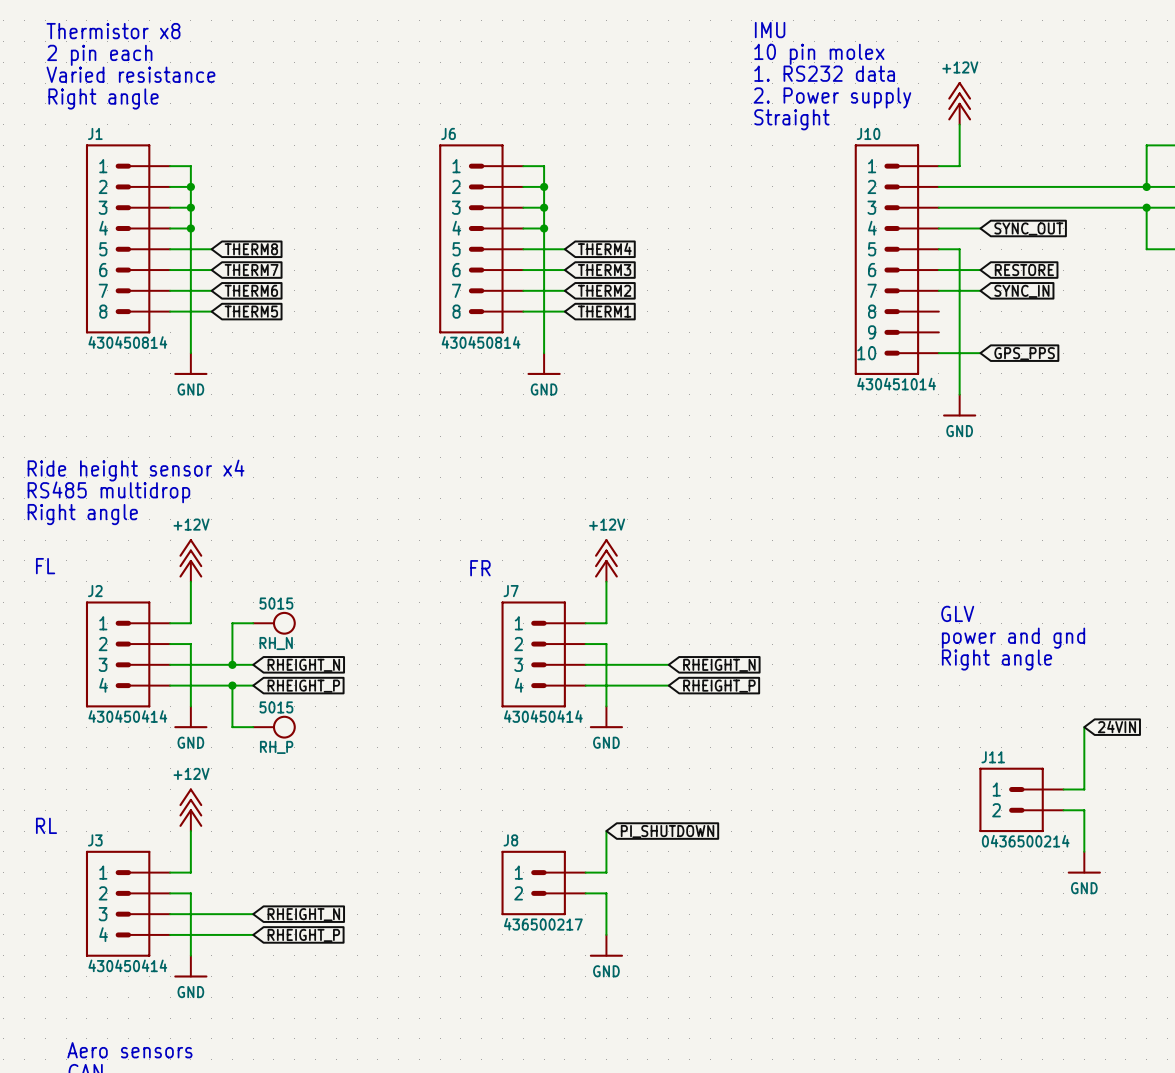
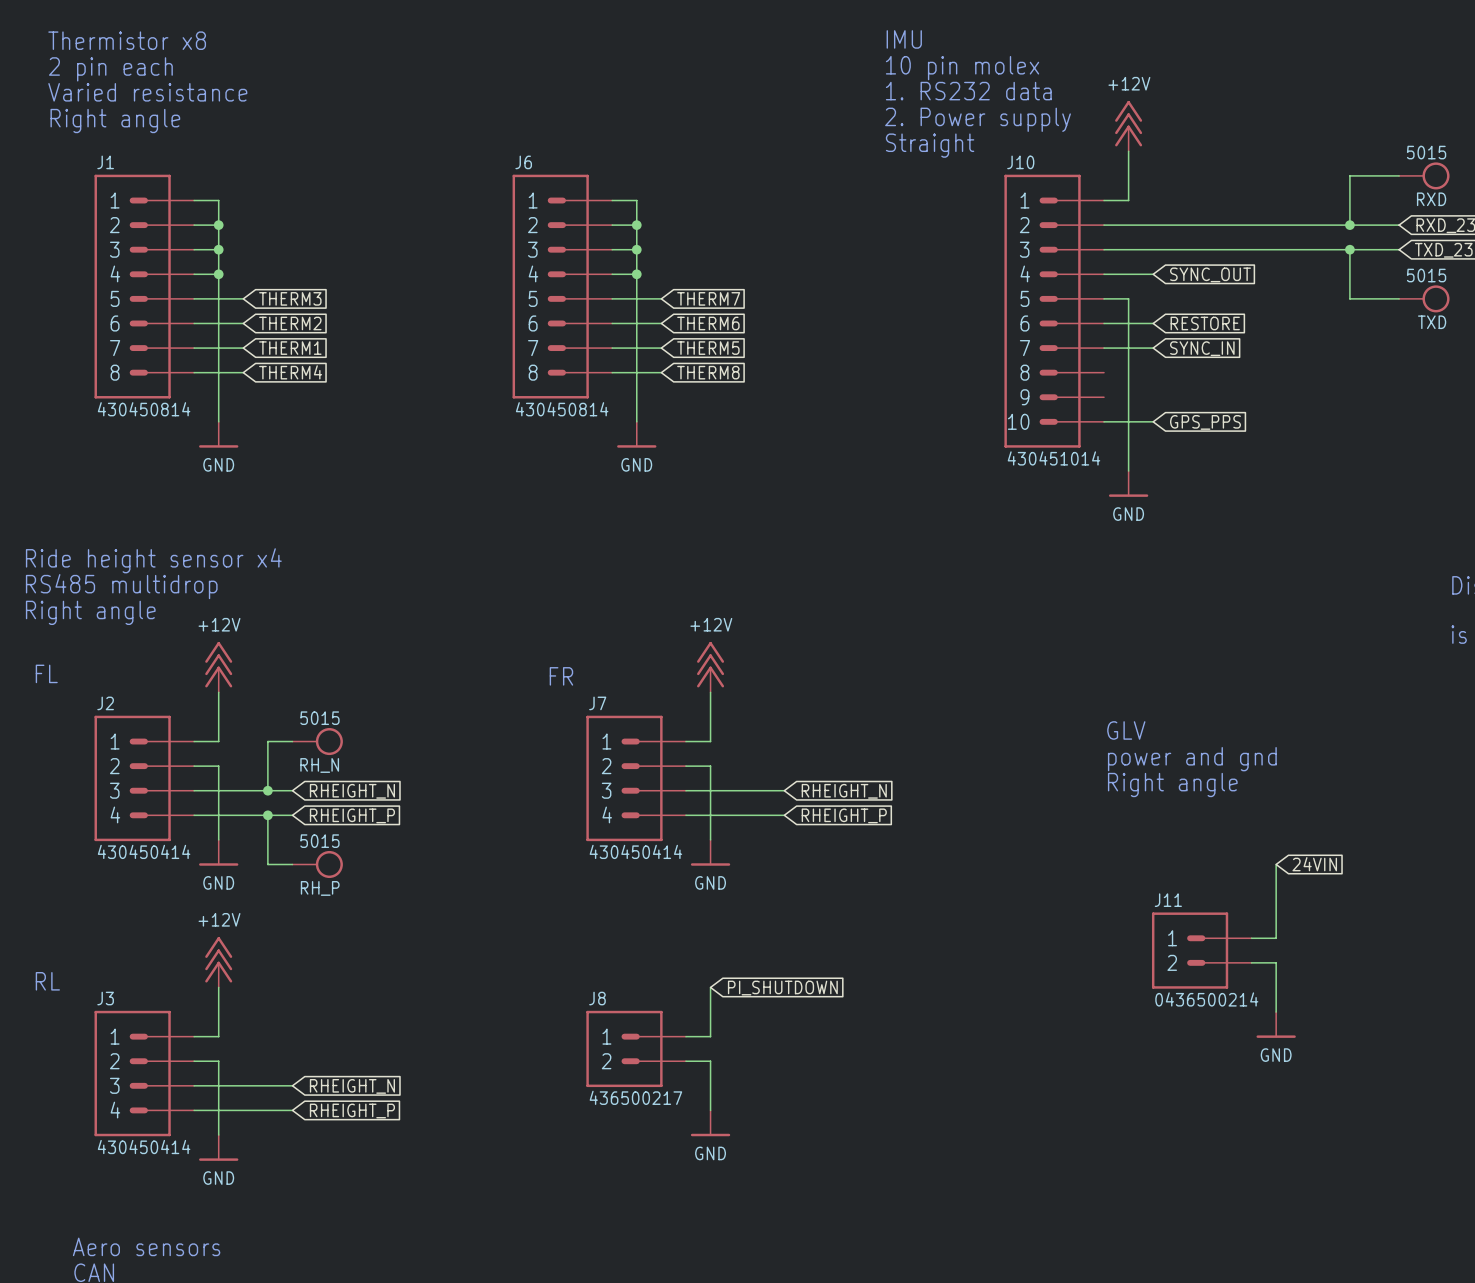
global label: THERM8 (251, 249) -> THERM3 (290, 298)
global label: THERM4 (604, 249) -> THERM7 (708, 298)
global label: THERM7 (251, 270) -> THERM2 (290, 323)
global label: THERM3 (604, 270) -> THERM6 (708, 323)
global label: THERM6 (251, 290) -> THERM1 (290, 348)
global label: THERM2 (604, 290) -> THERM5 (708, 348)
global label: THERM5 (251, 311) -> THERM4 (290, 372)
global label: THERM1 (604, 311) -> THERM8 (708, 372)

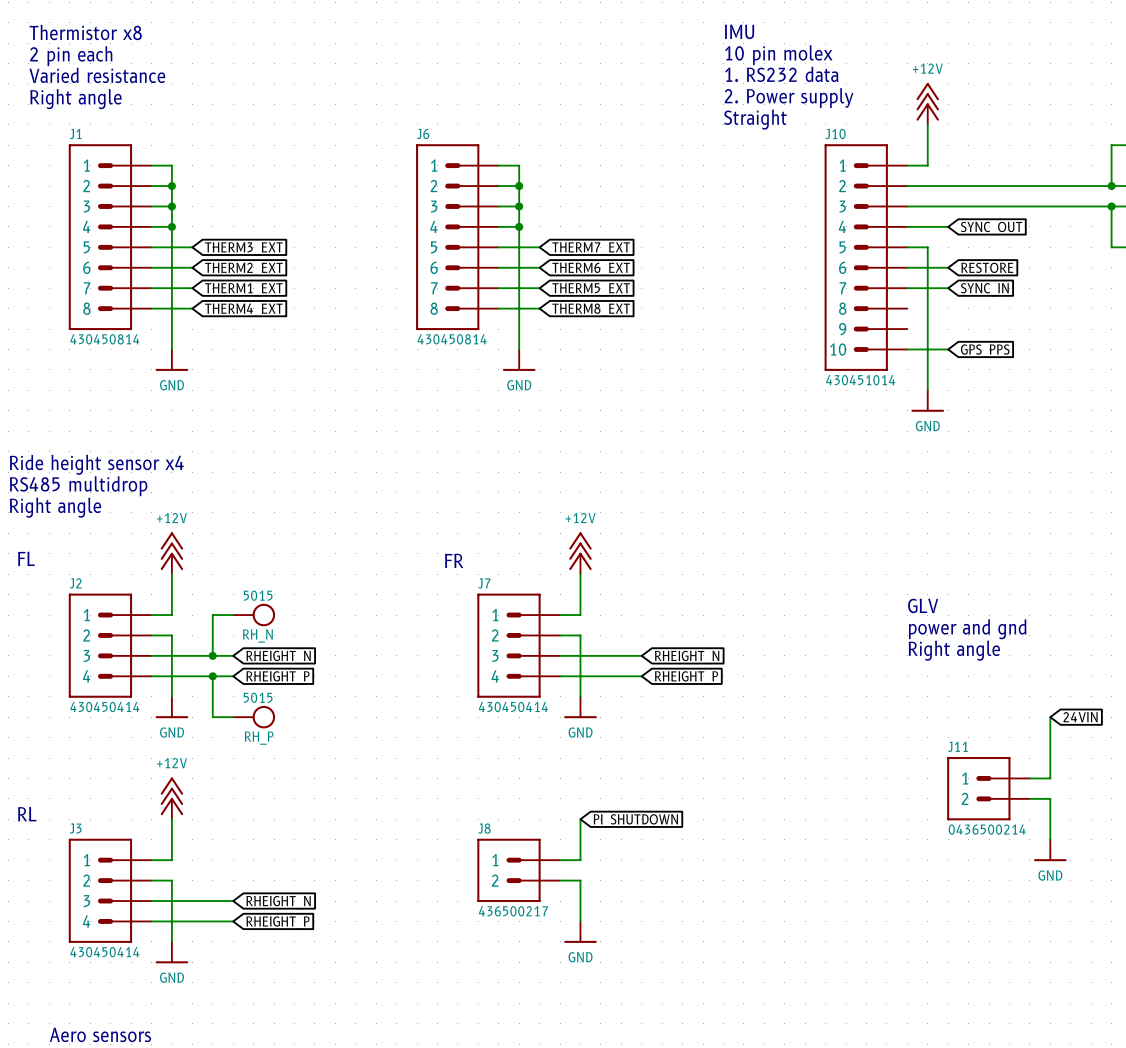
global label: THERM3 (290, 298) -> THERM3_EXT (243, 248)
global label: THERM7 (708, 298) -> THERM7_EXT (591, 248)
global label: THERM2 (290, 323) -> THERM2_EXT (243, 269)
global label: THERM6 (708, 323) -> THERM6_EXT (591, 269)
global label: THERM1 (290, 348) -> THERM1_EXT (243, 289)
global label: THERM5 (708, 348) -> THERM5_EXT (591, 289)
global label: THERM4 (290, 372) -> THERM4_EXT (243, 310)
global label: THERM8 (708, 372) -> THERM8_EXT (591, 310)

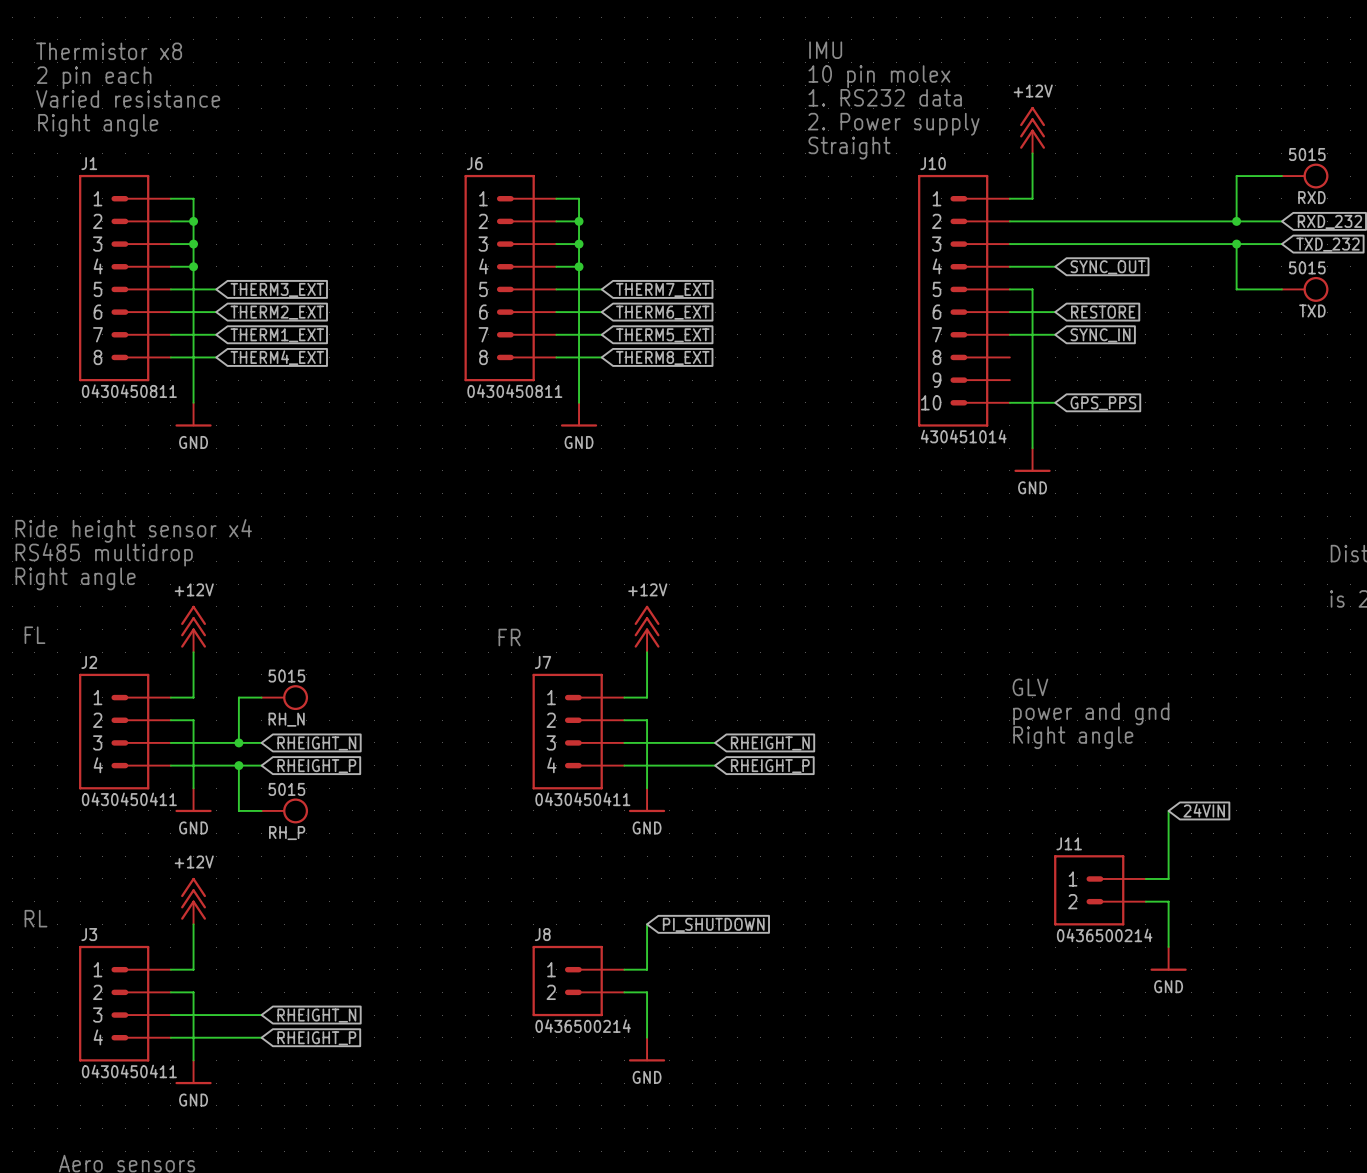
J1 text: 430450814 (104, 339) -> 0430450811 (129, 391)
J6 text: 430450814 (452, 339) -> 0430450811 (514, 391)
J2 text: 430450414 (104, 707) -> 0430450411 (129, 799)
J7 text: 430450414 (513, 707) -> 0430450411 (582, 799)
J8 text: 436500217 (513, 911) -> 0436500214 (583, 1026)
J3 text: 430450414 (104, 952) -> 0430450411 (129, 1071)

